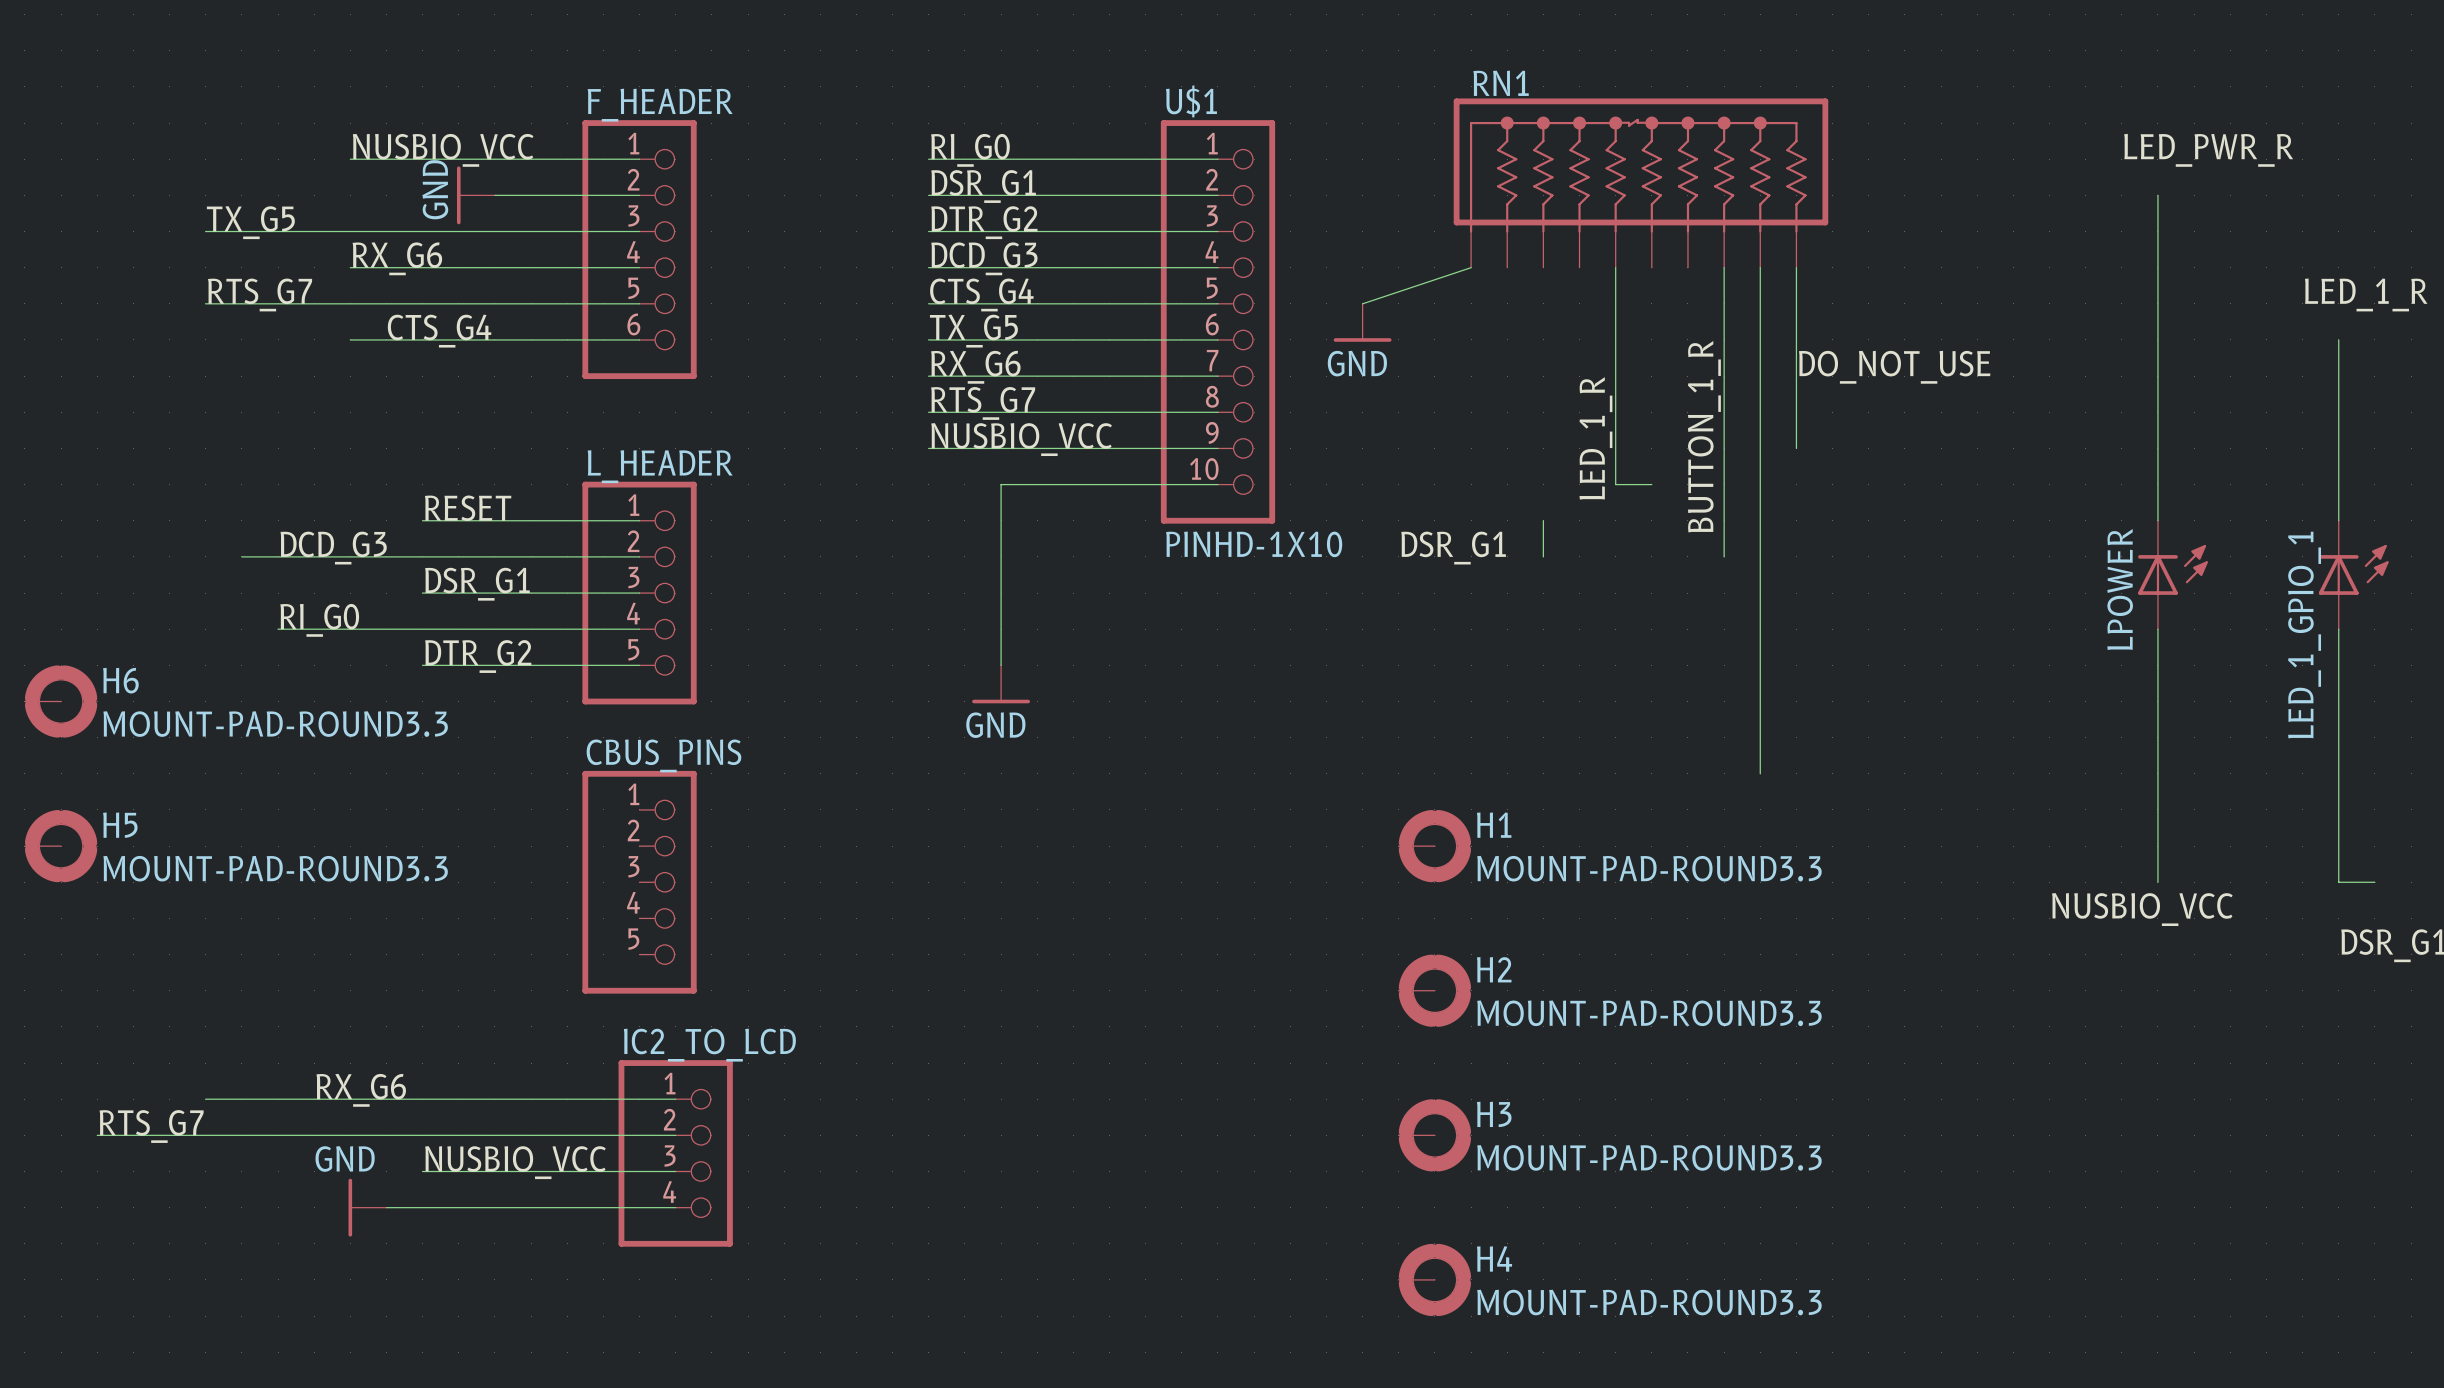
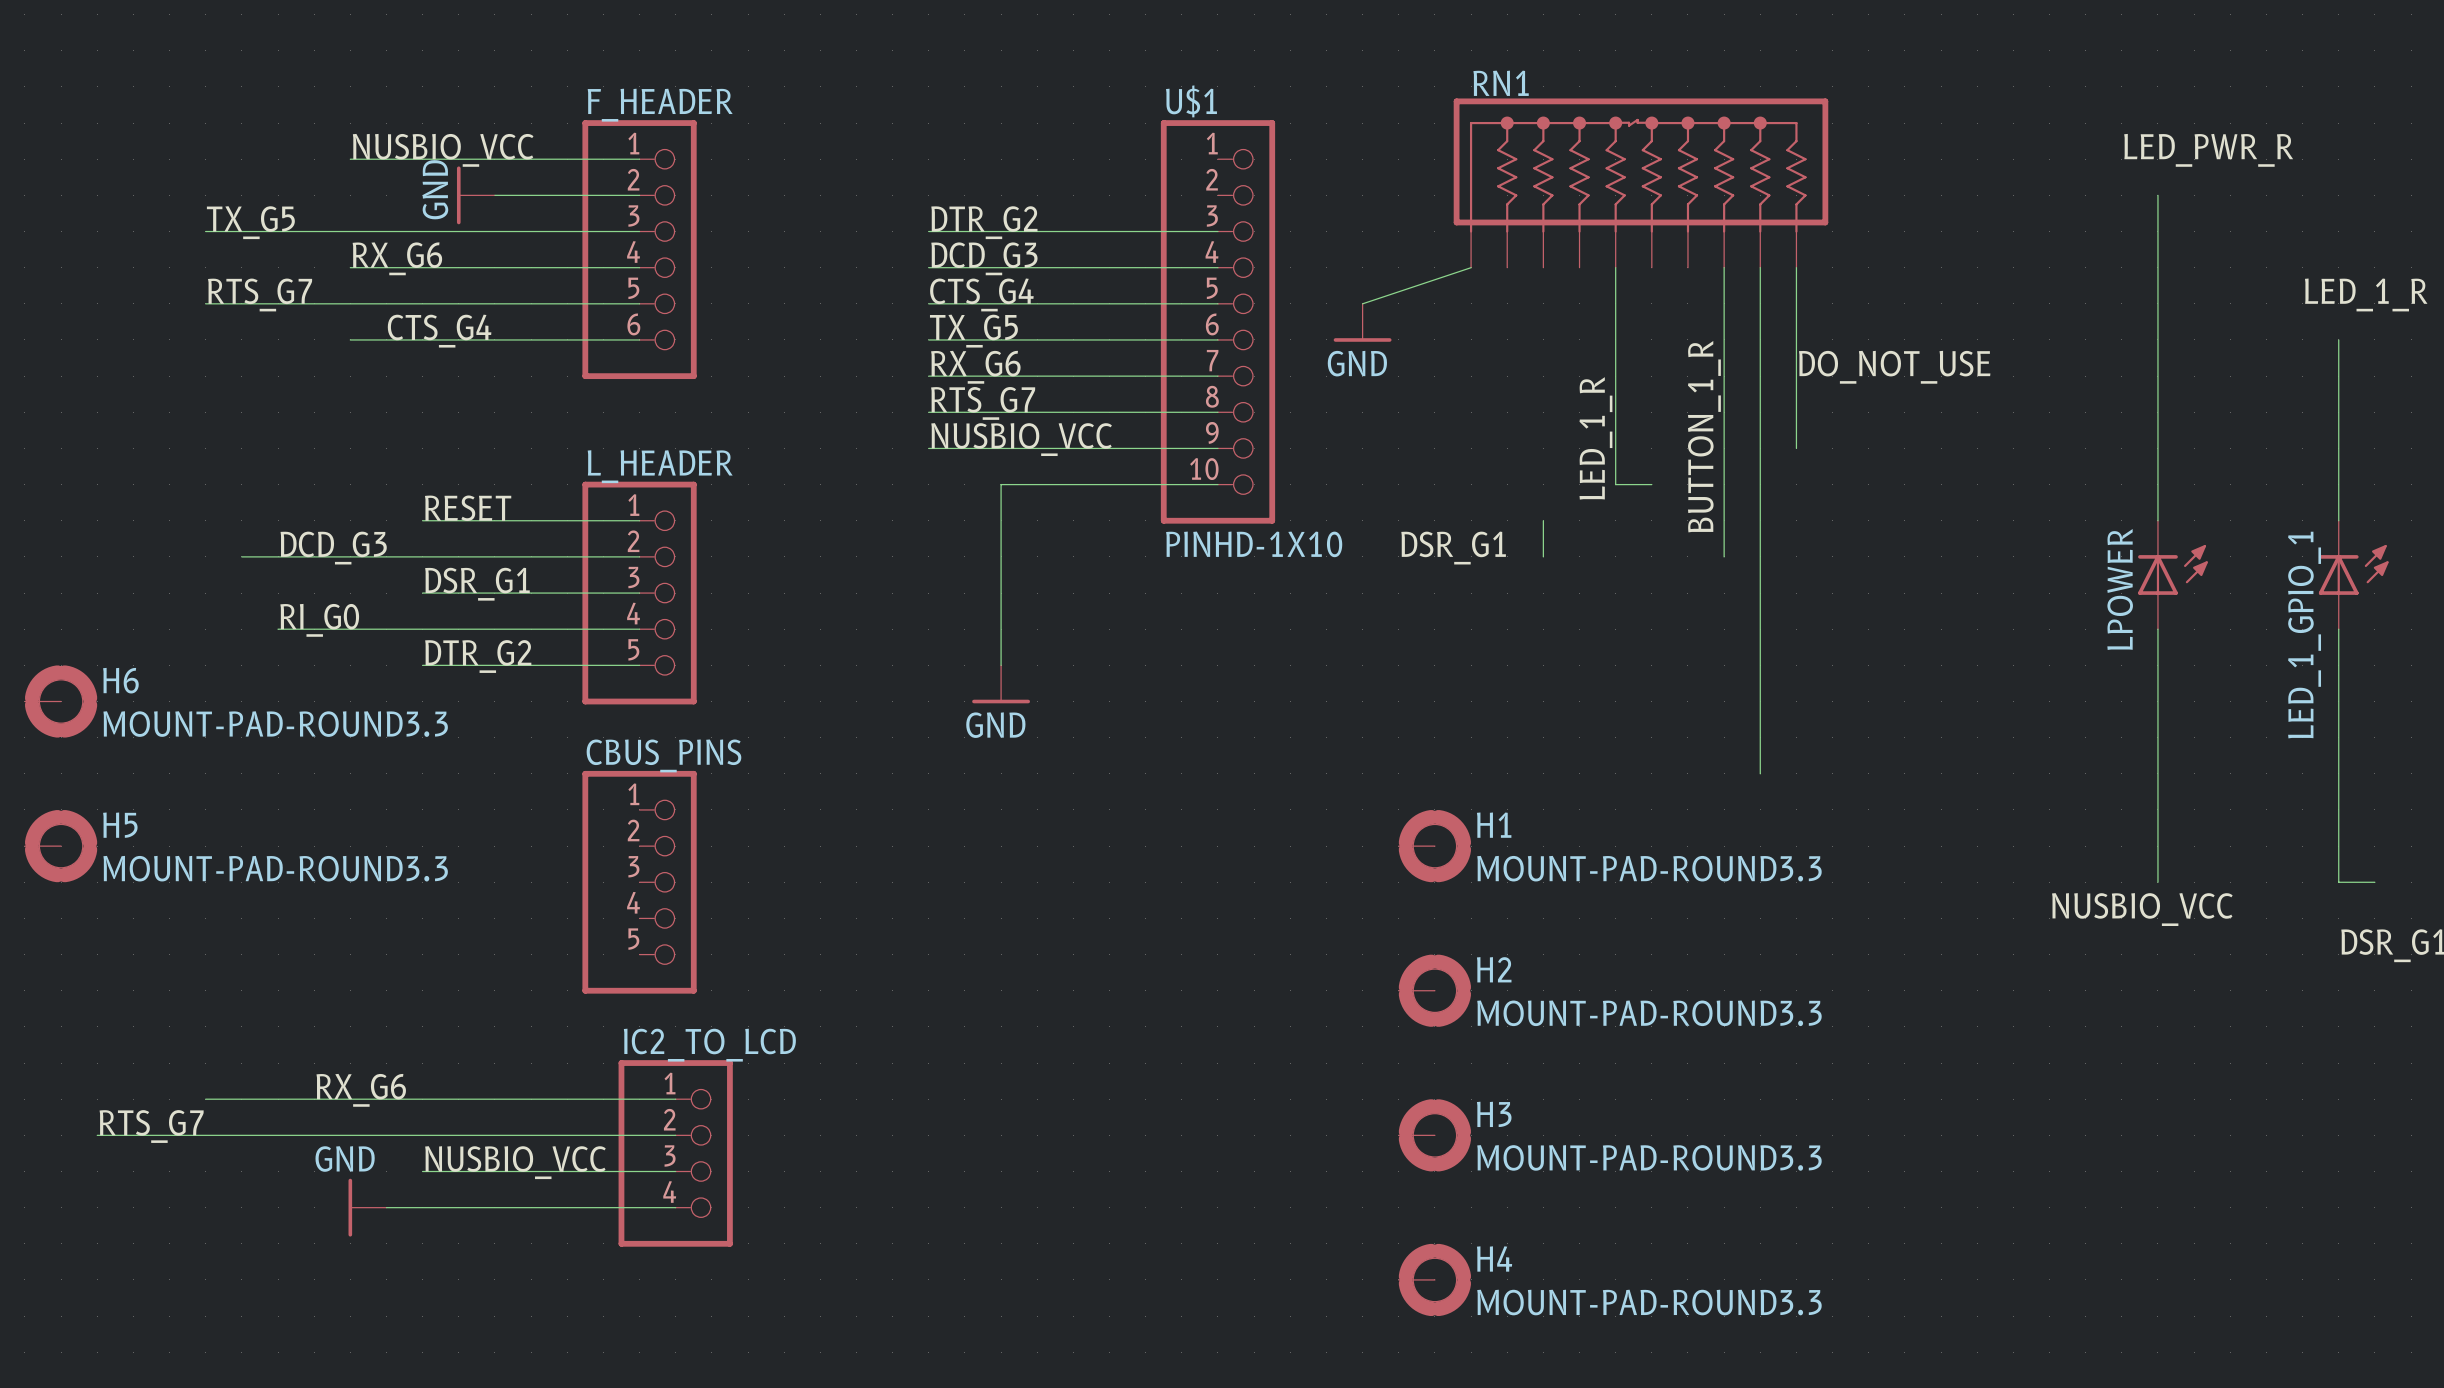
label: RI_G0 (970, 150) -> none
wire: (928, 159) (1217, 159) -> none
label: DSR_G1 (983, 186) -> none
wire: (928, 195) (1217, 195) -> none

